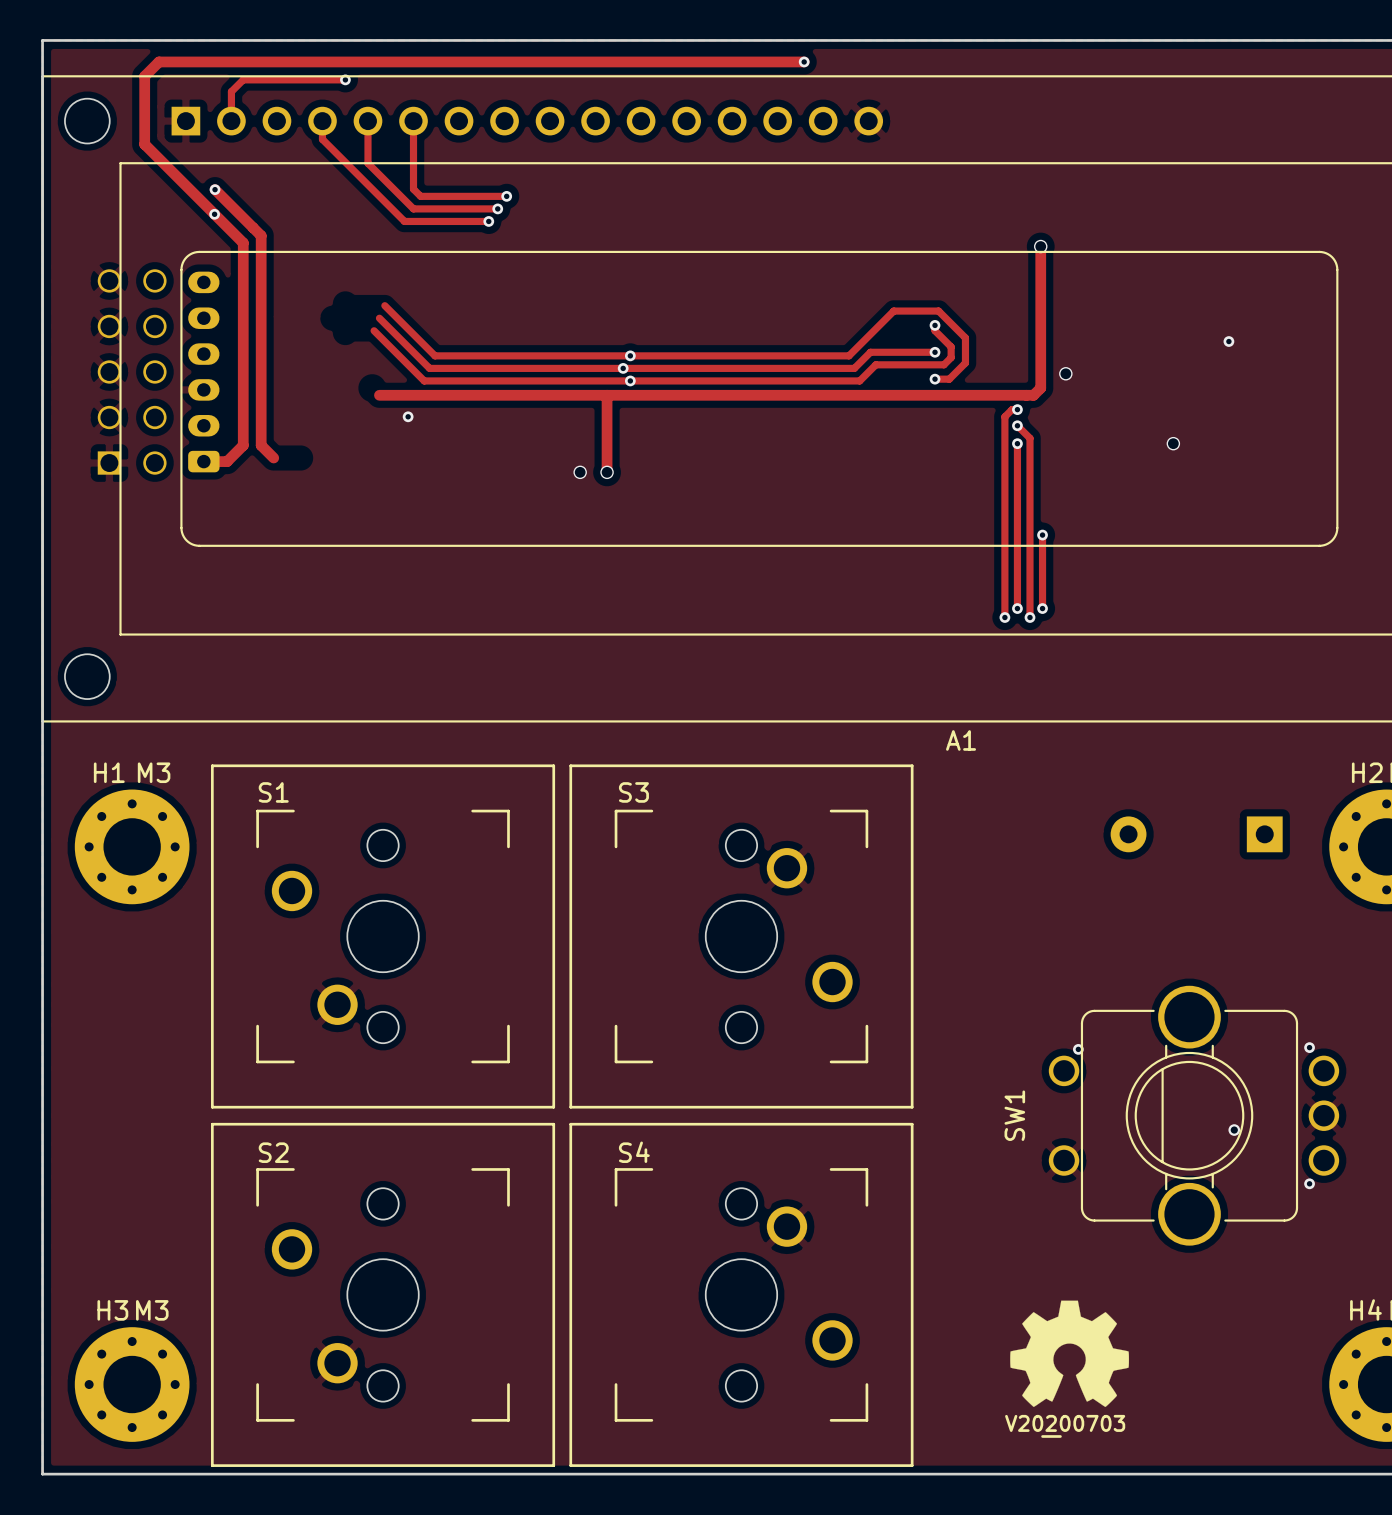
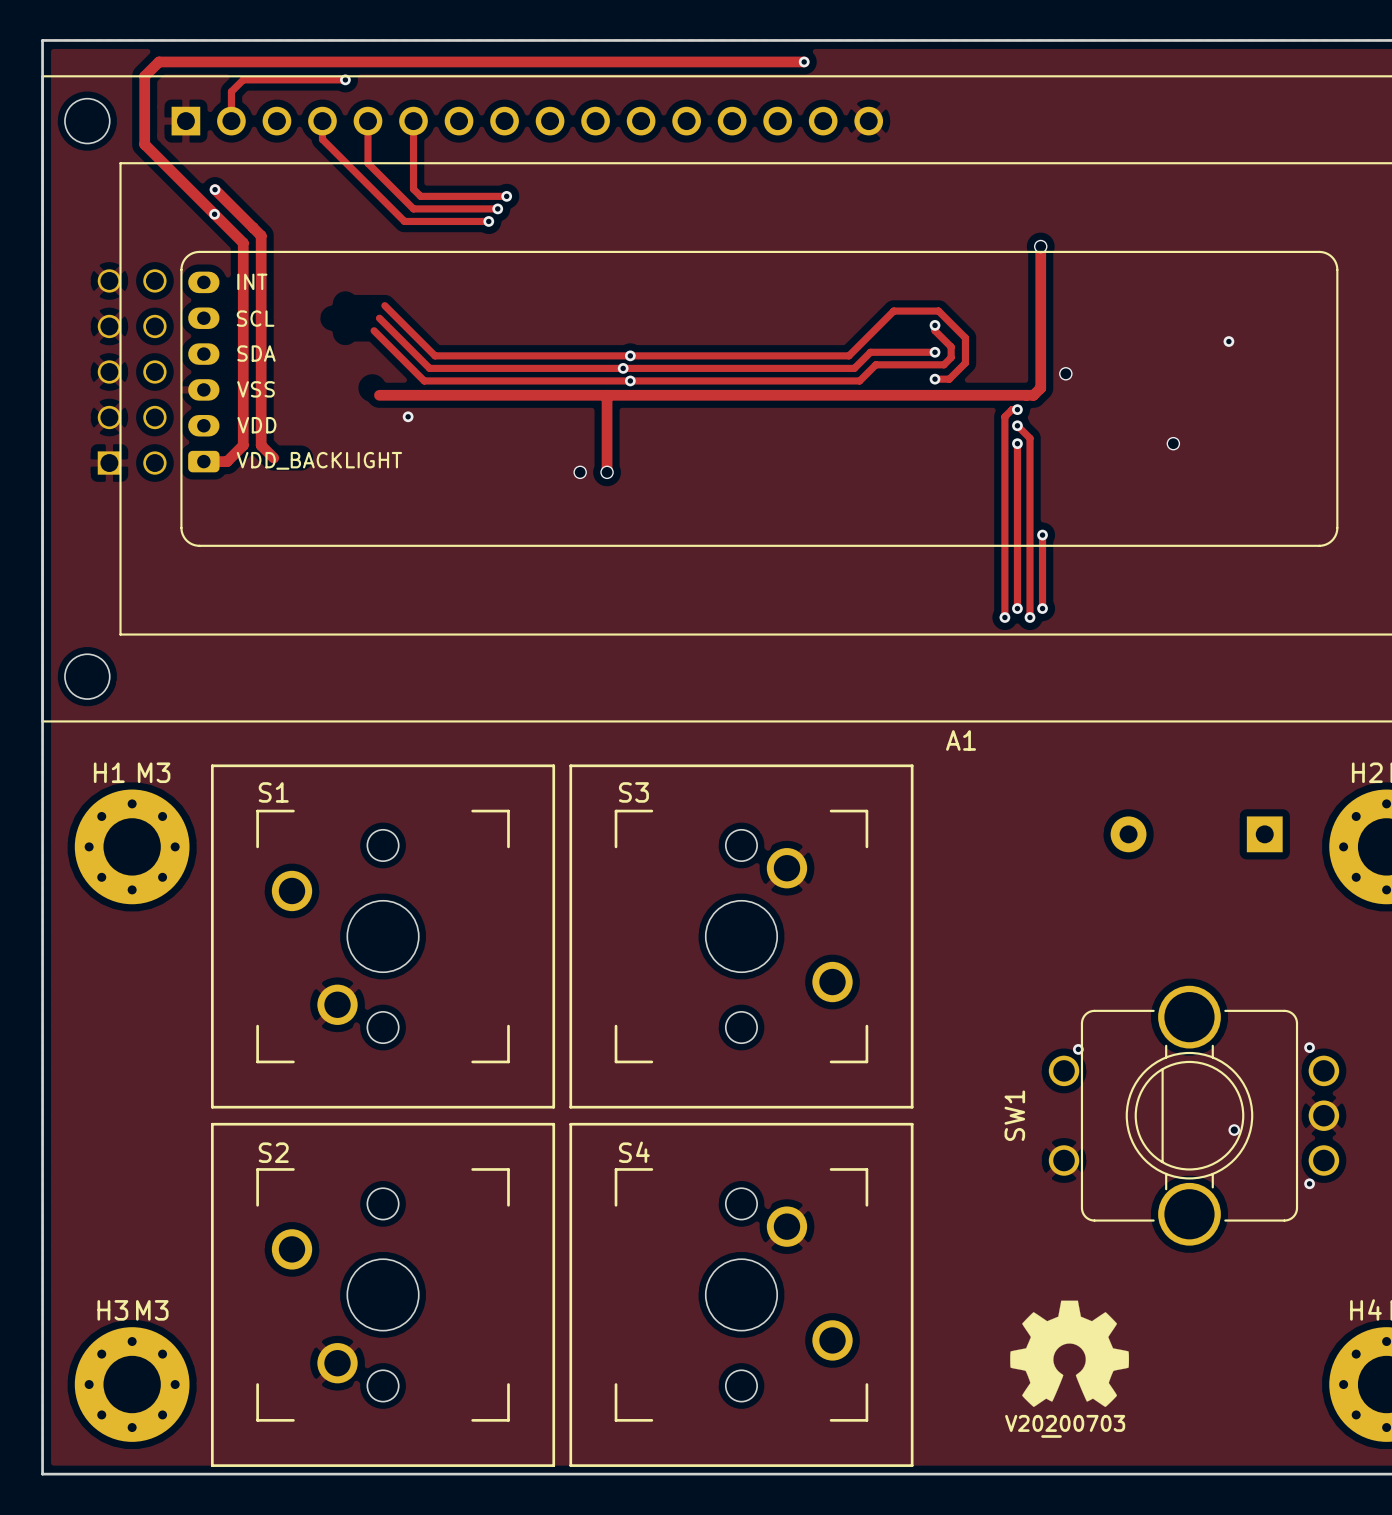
text: none -> INT (252, 281)
text: none -> SCL (255, 318)
text: none -> SDA (256, 353)
text: none -> VSS (256, 389)
text: none -> VDD (256, 425)
text: none -> VDD_BACKLIGHT (319, 460)

